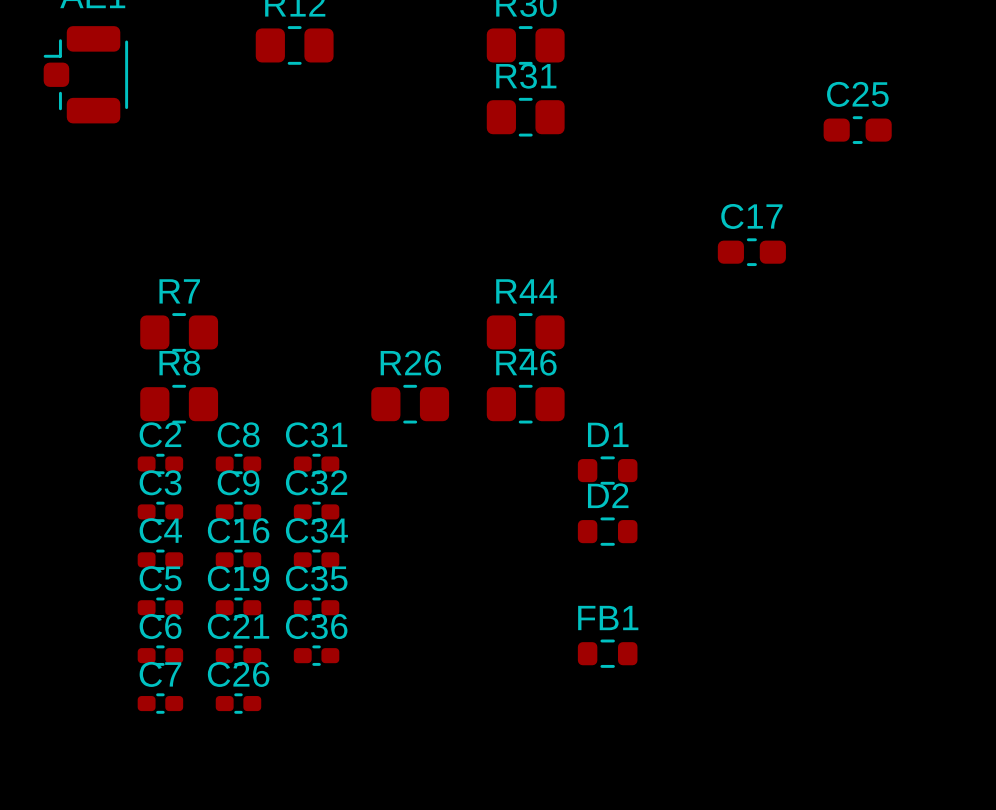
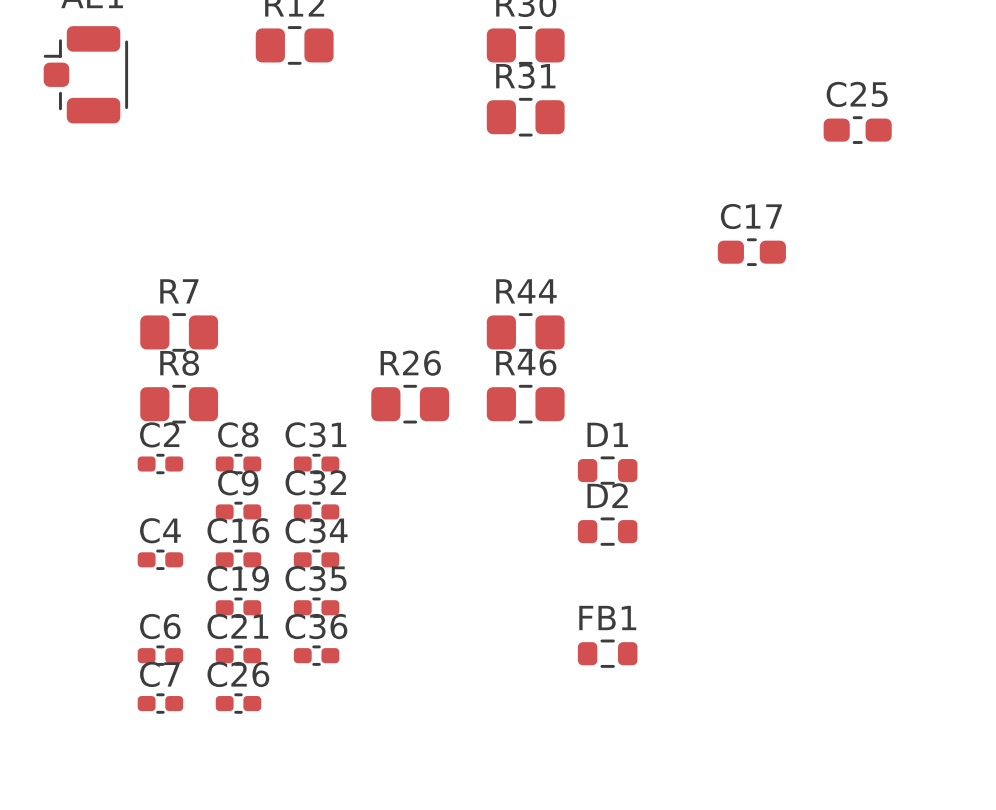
C3: (160, 511) -> none
C5: (160, 607) -> none

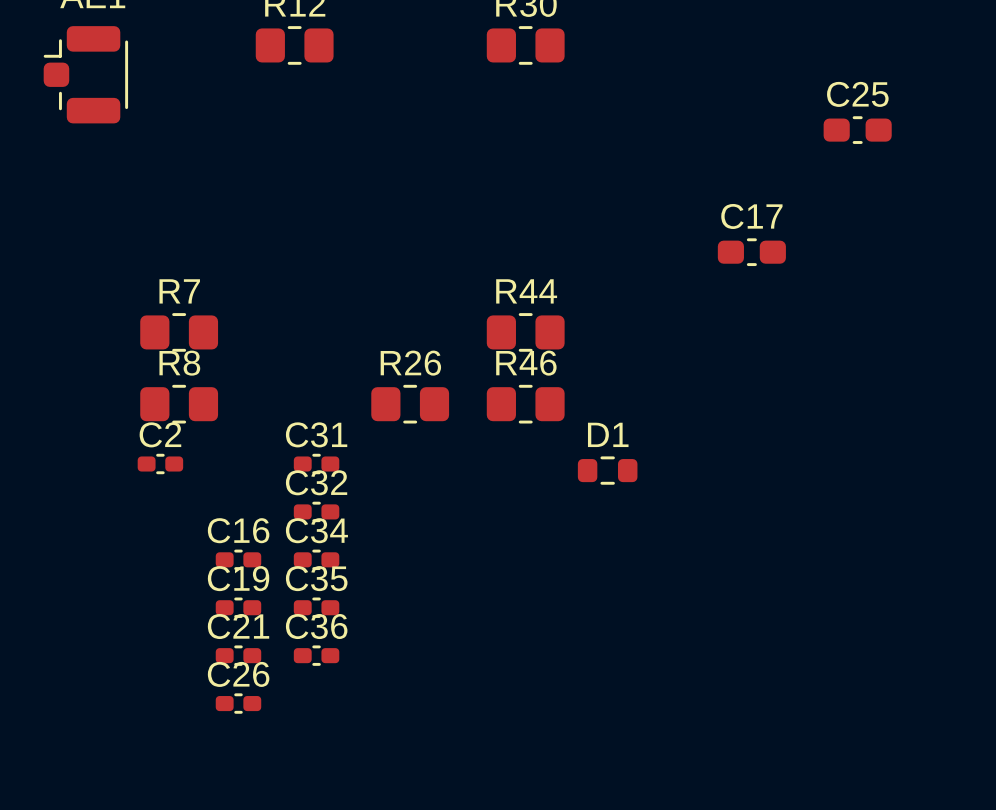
R31: (525, 117) -> none
C8: (238, 464) -> none
C9: (238, 511) -> none
D2: (607, 531) -> none
C4: (160, 559) -> none
FB1: (607, 653) -> none
C6: (160, 655) -> none
C7: (160, 703) -> none

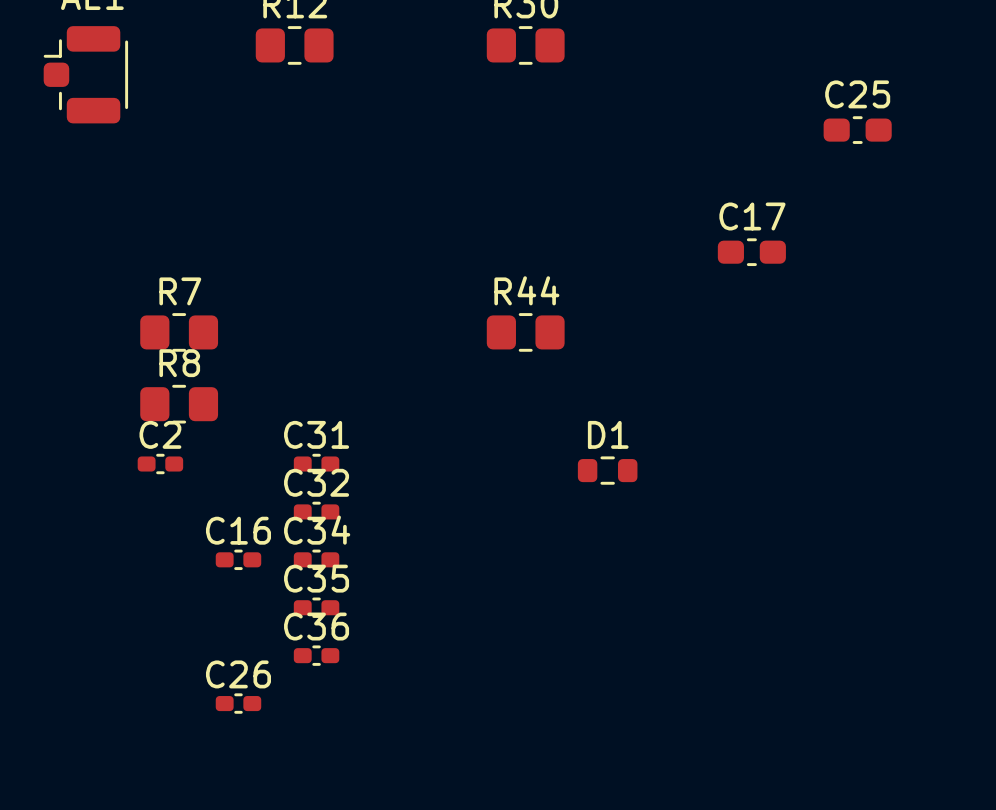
R26: (410, 404) -> none
R46: (525, 404) -> none
C19: (238, 607) -> none
C21: (238, 655) -> none

